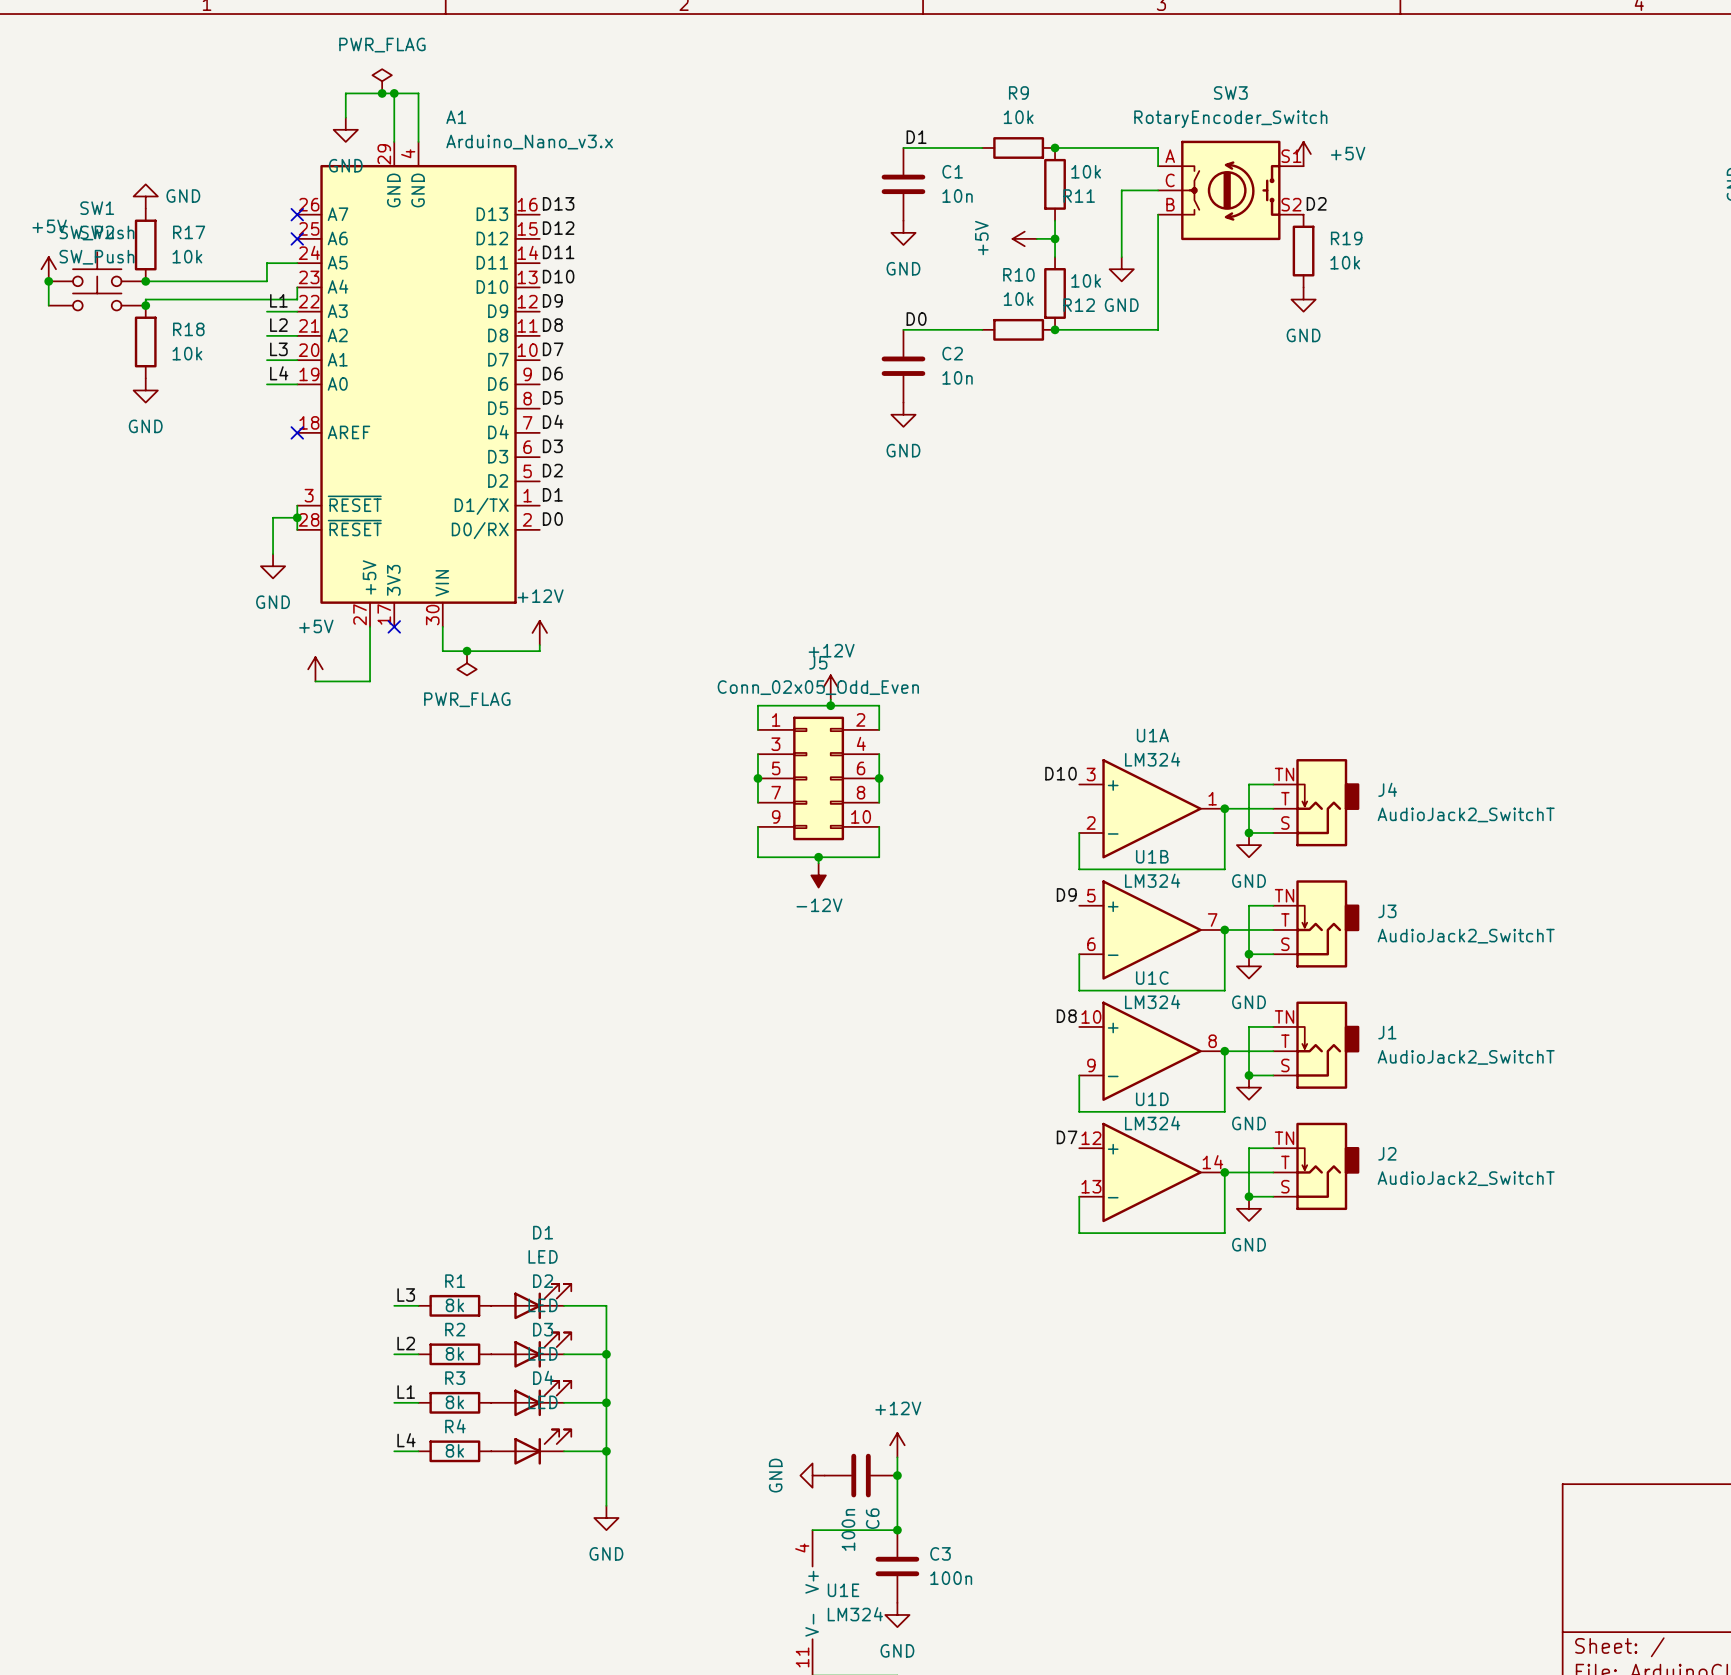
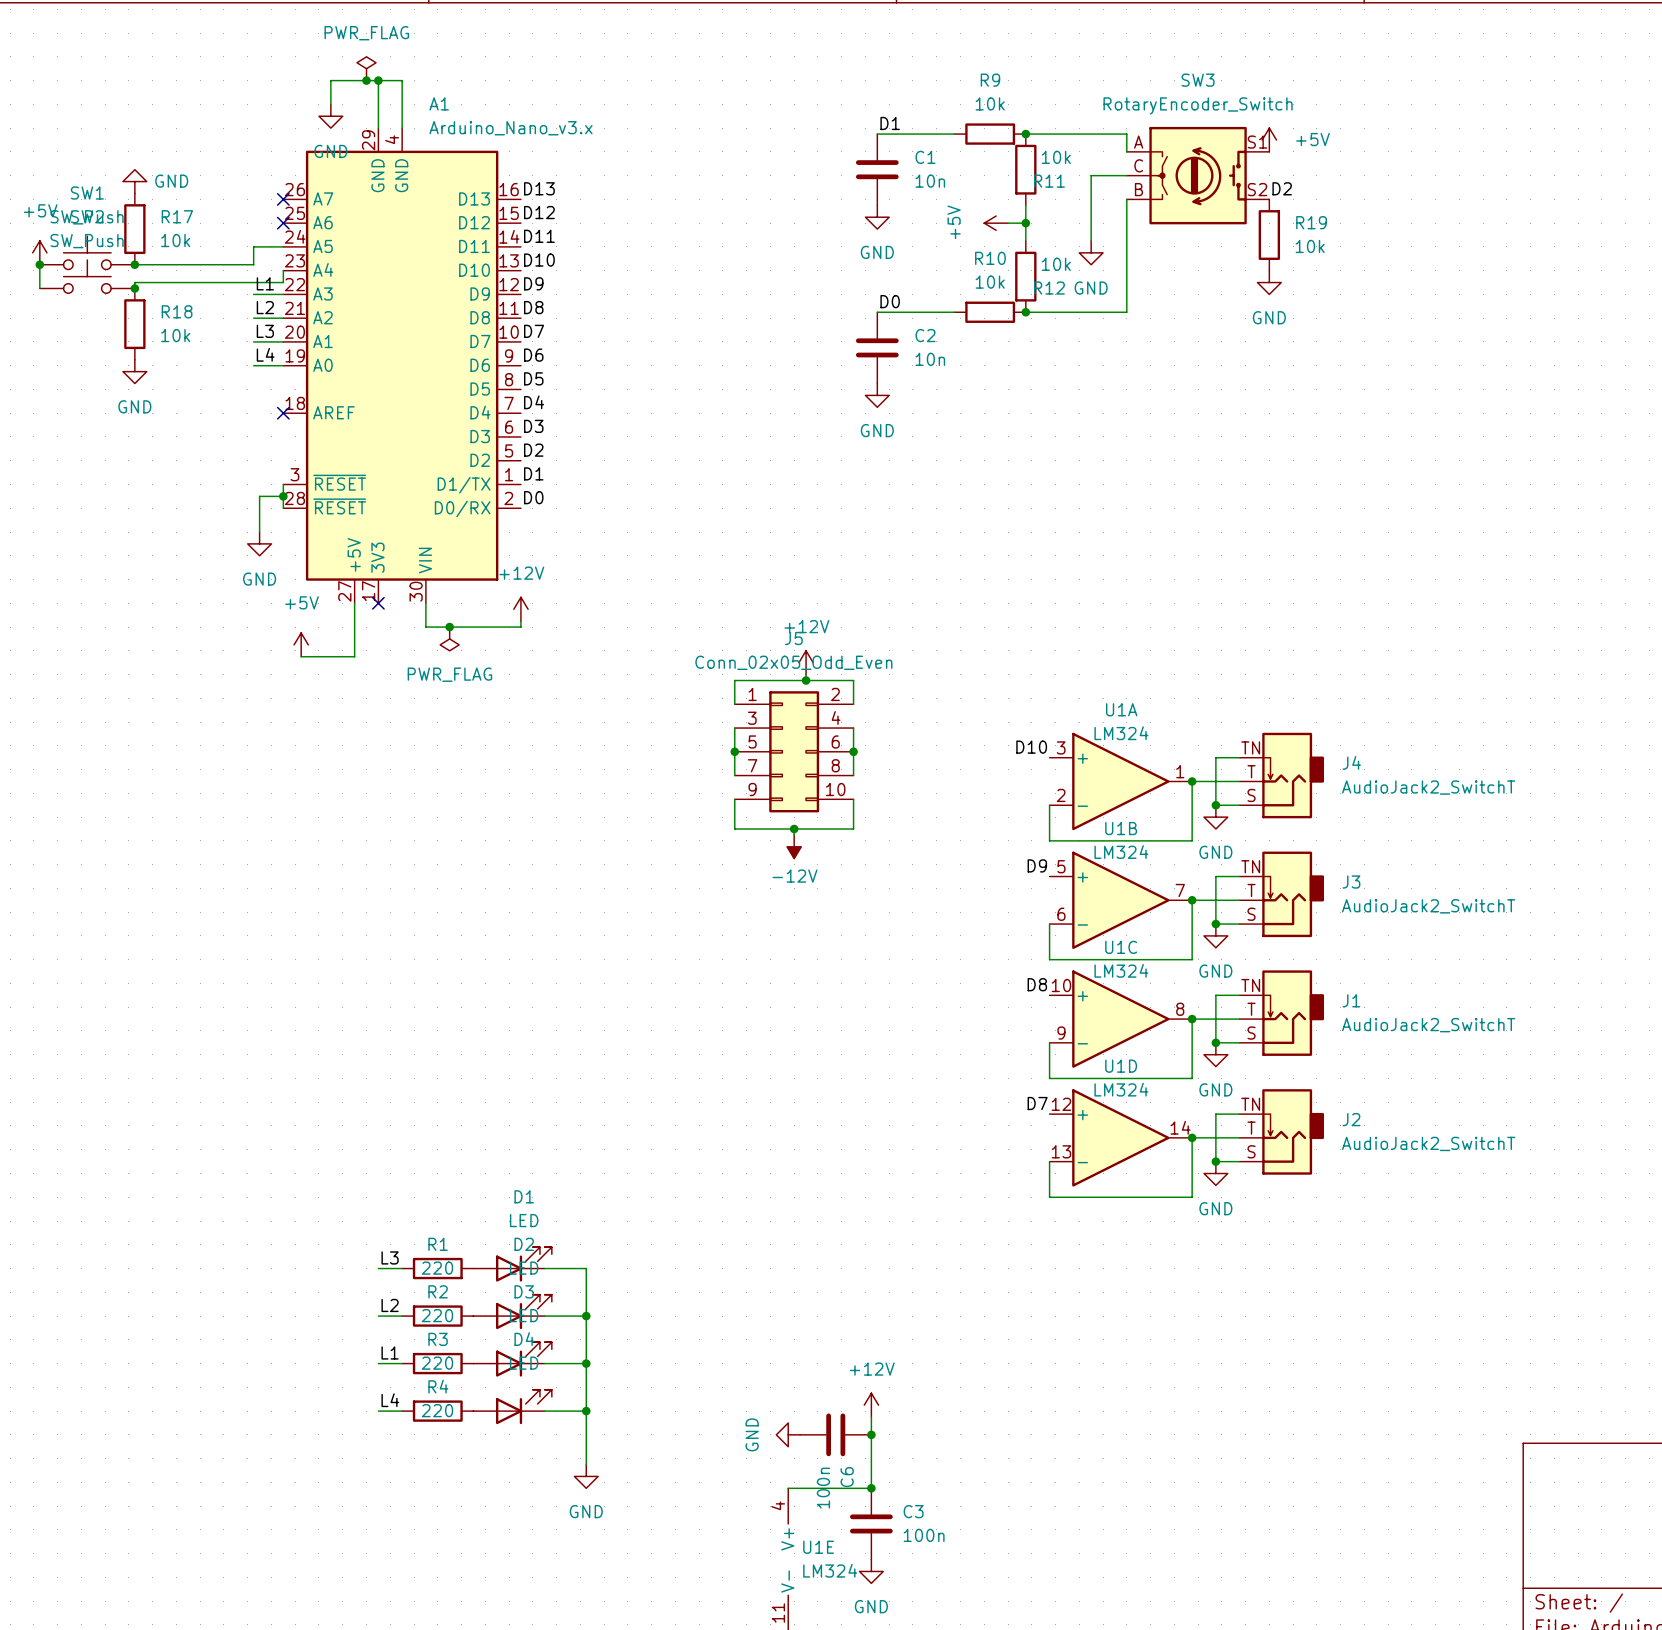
R1 value: 8k (454, 1305) -> 220 (437, 1268)
R2 value: 8k (454, 1353) -> 220 (437, 1315)
R3 value: 8k (454, 1402) -> 220 (437, 1363)
R4 value: 8k (454, 1450) -> 220 (437, 1410)

